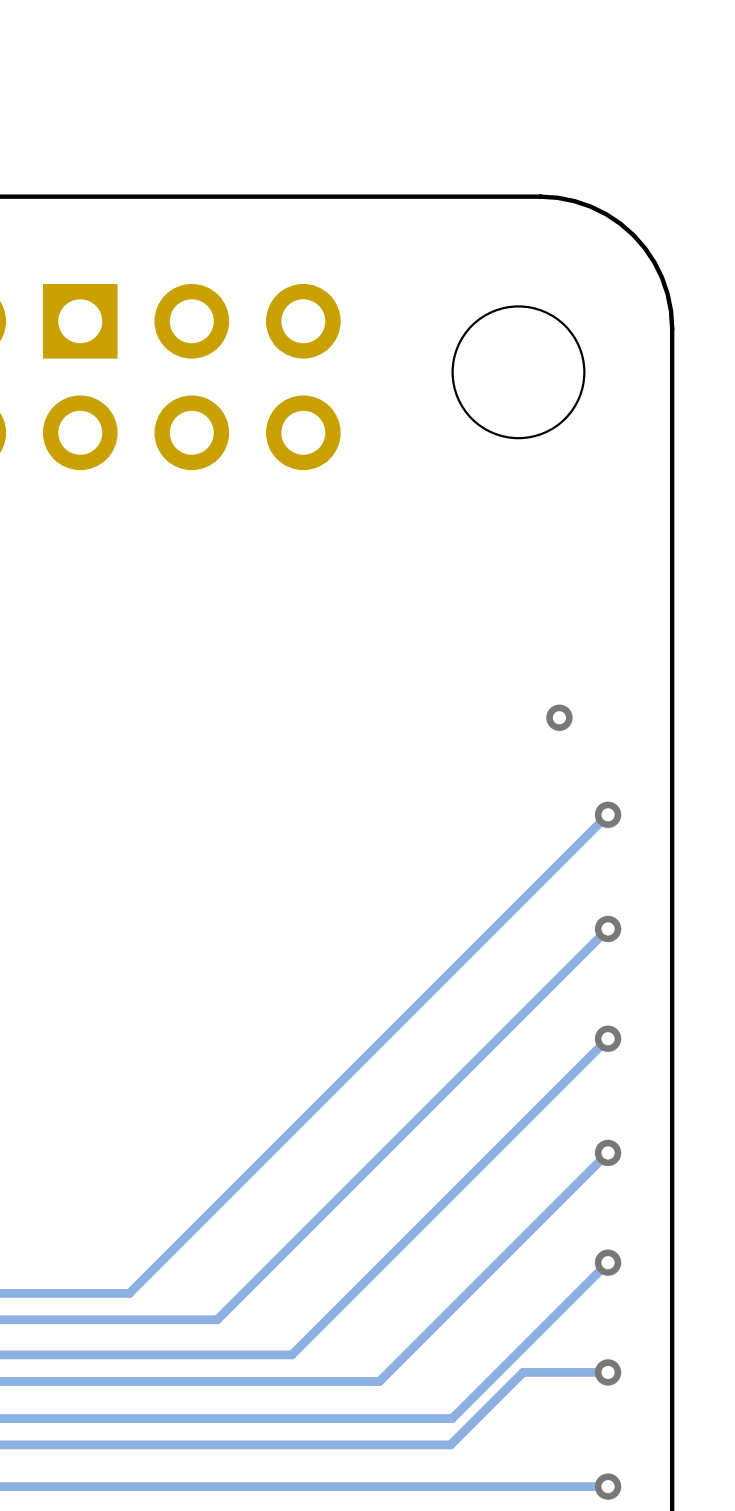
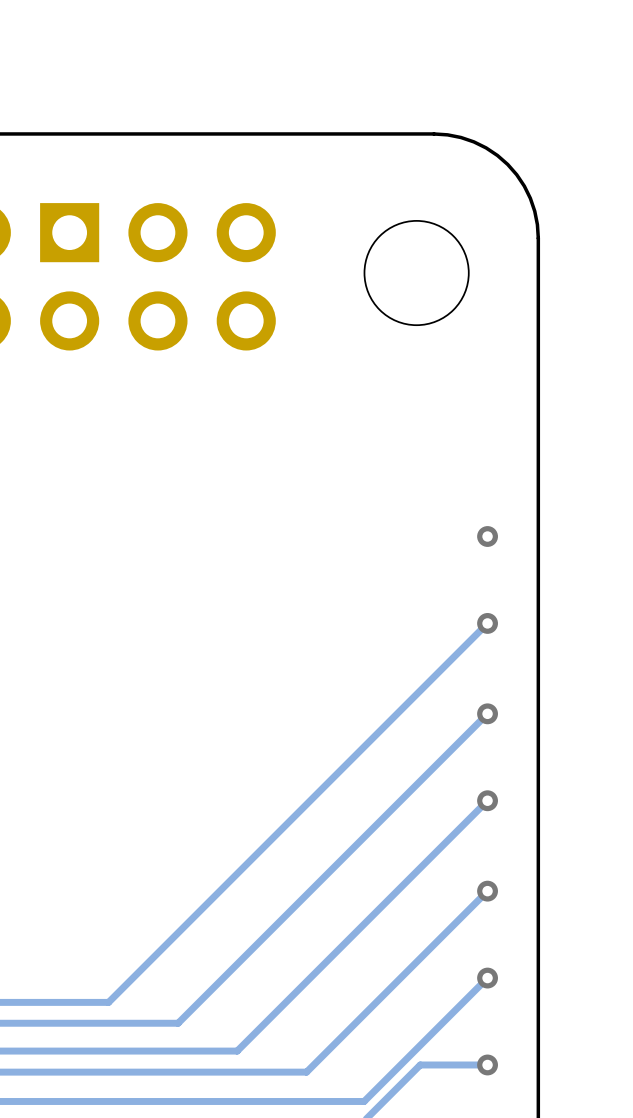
via position: (559, 717) -> (487, 536)

